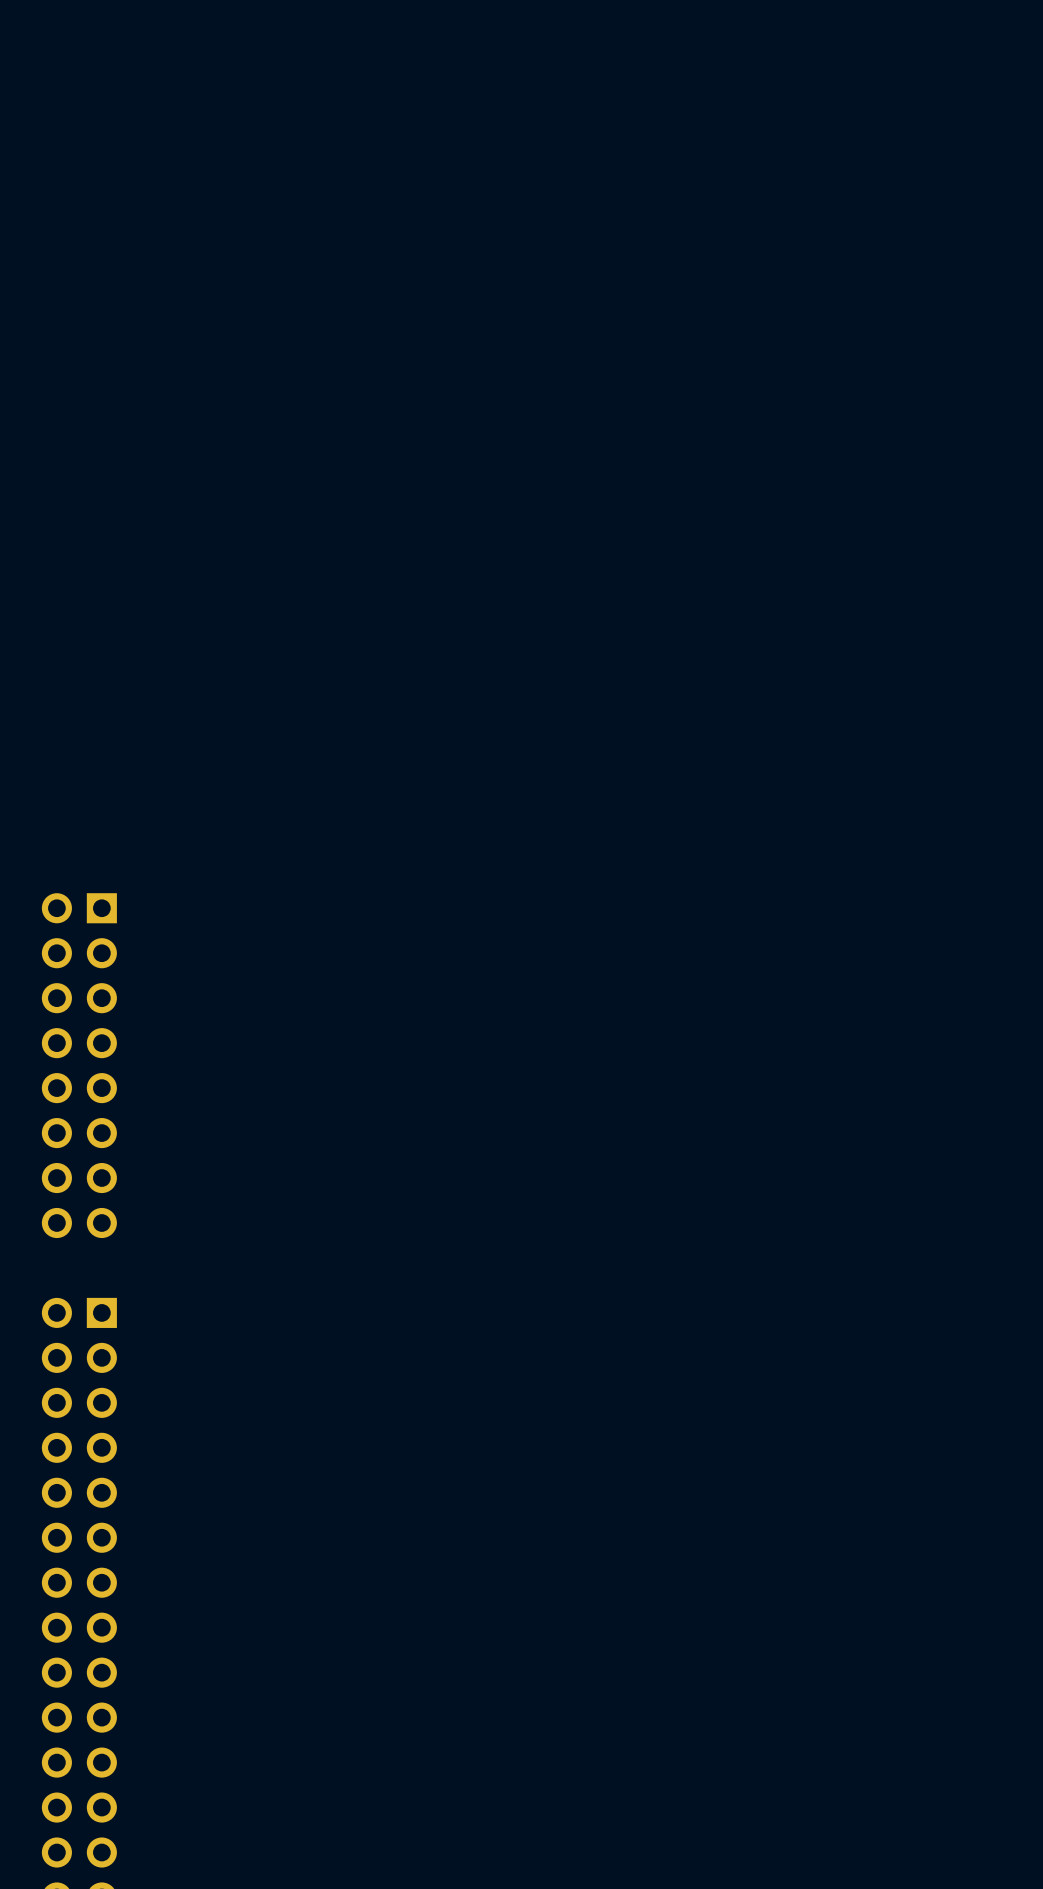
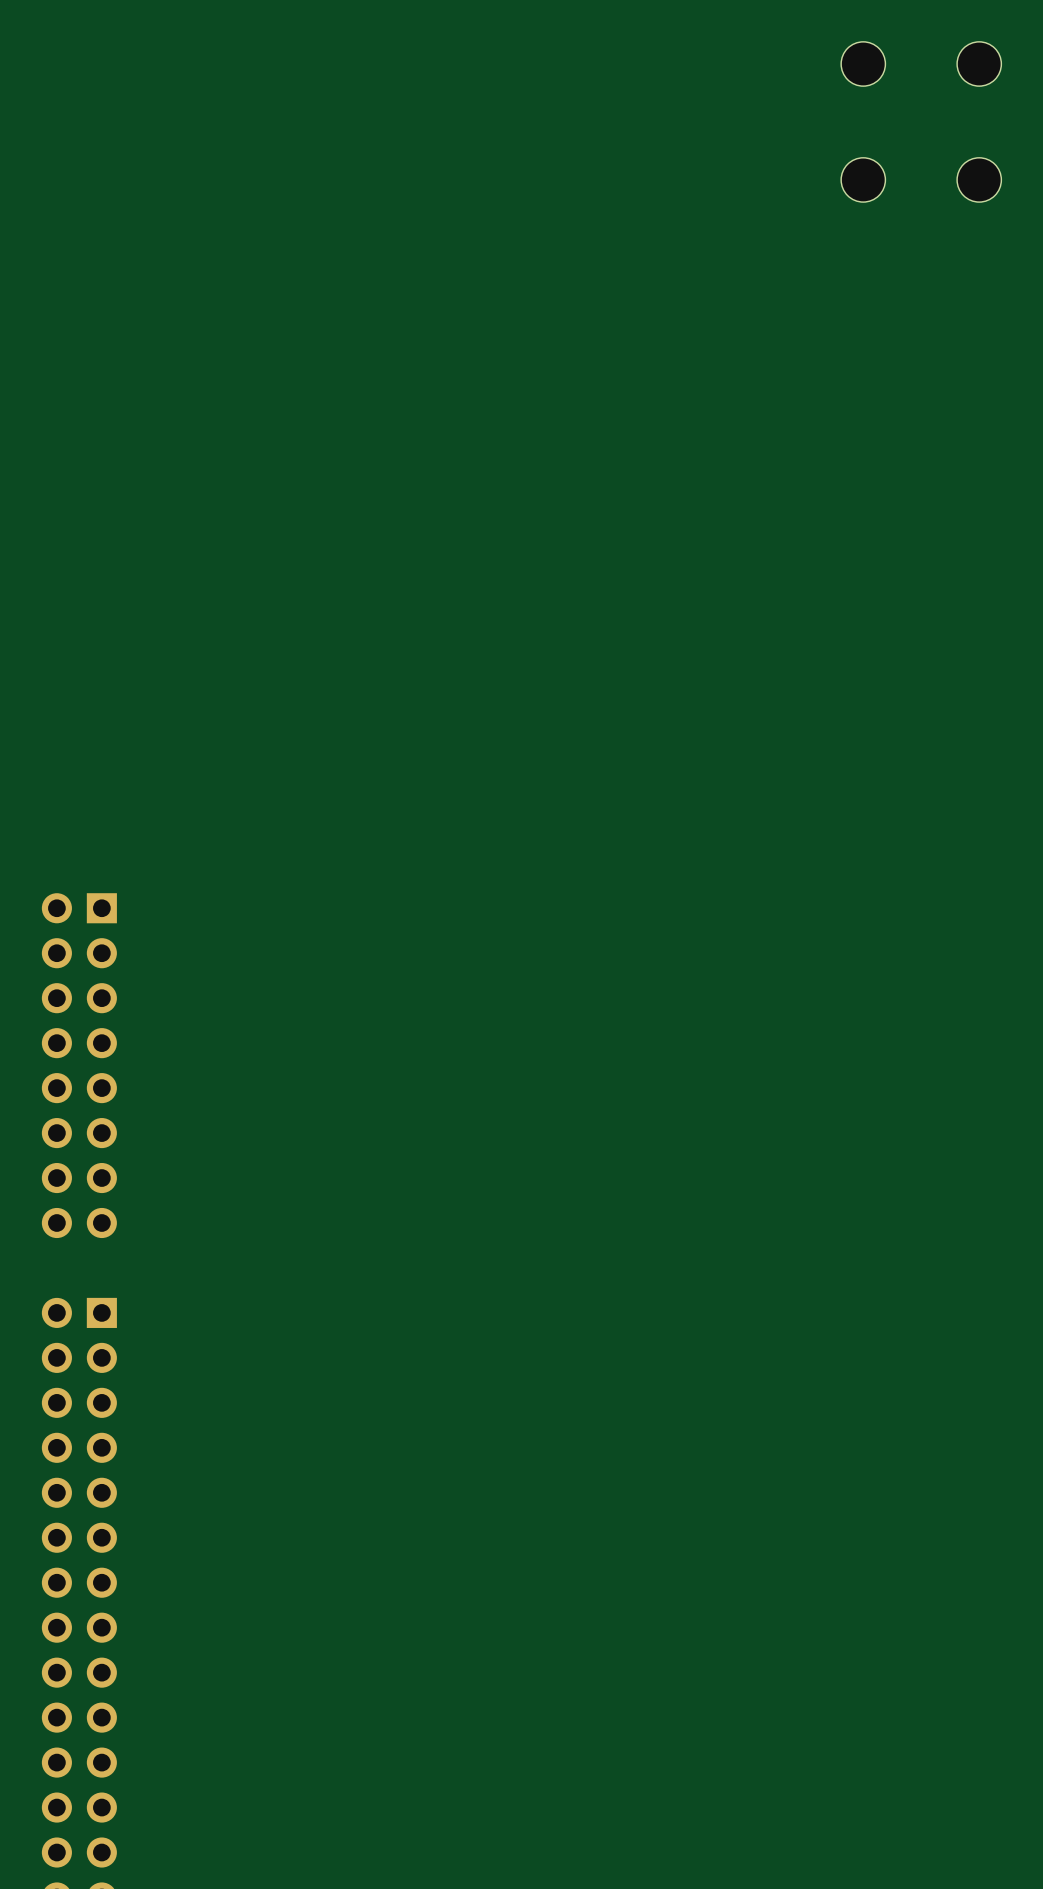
part: none -> (863, 63)
part: none -> (979, 63)
part: none -> (863, 179)
part: none -> (979, 179)

